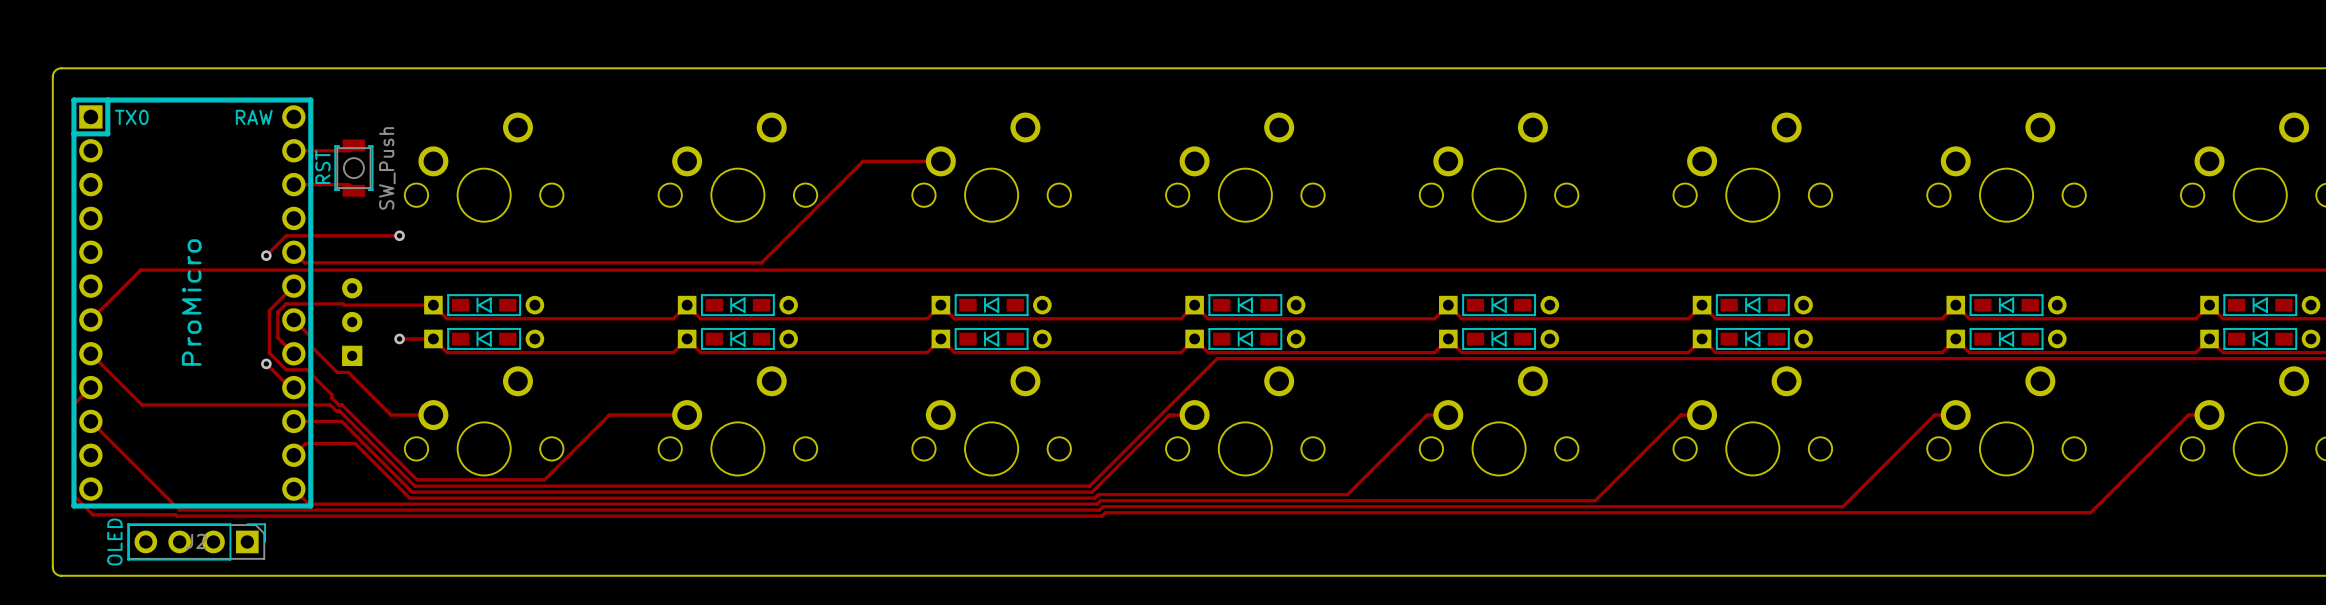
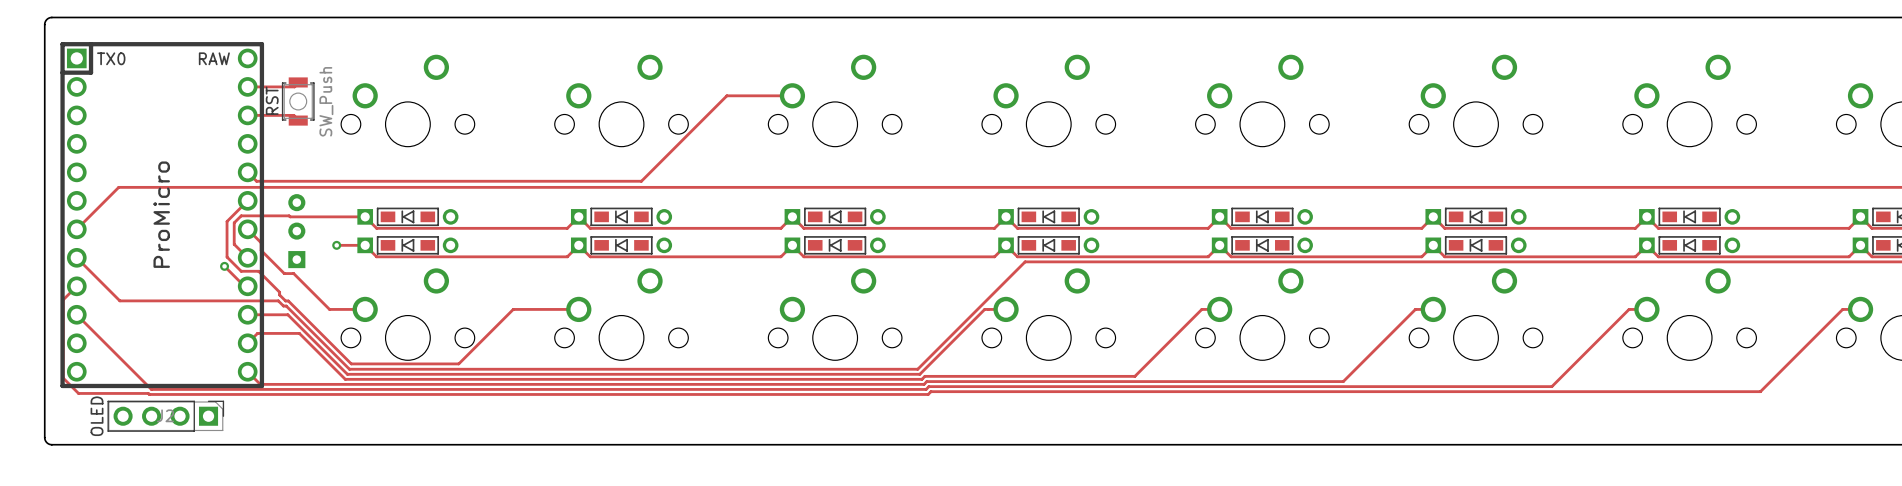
track: (399, 235) (286, 235) (266, 255) -> none
via: (399, 235) -> none
via: (266, 255) -> none

